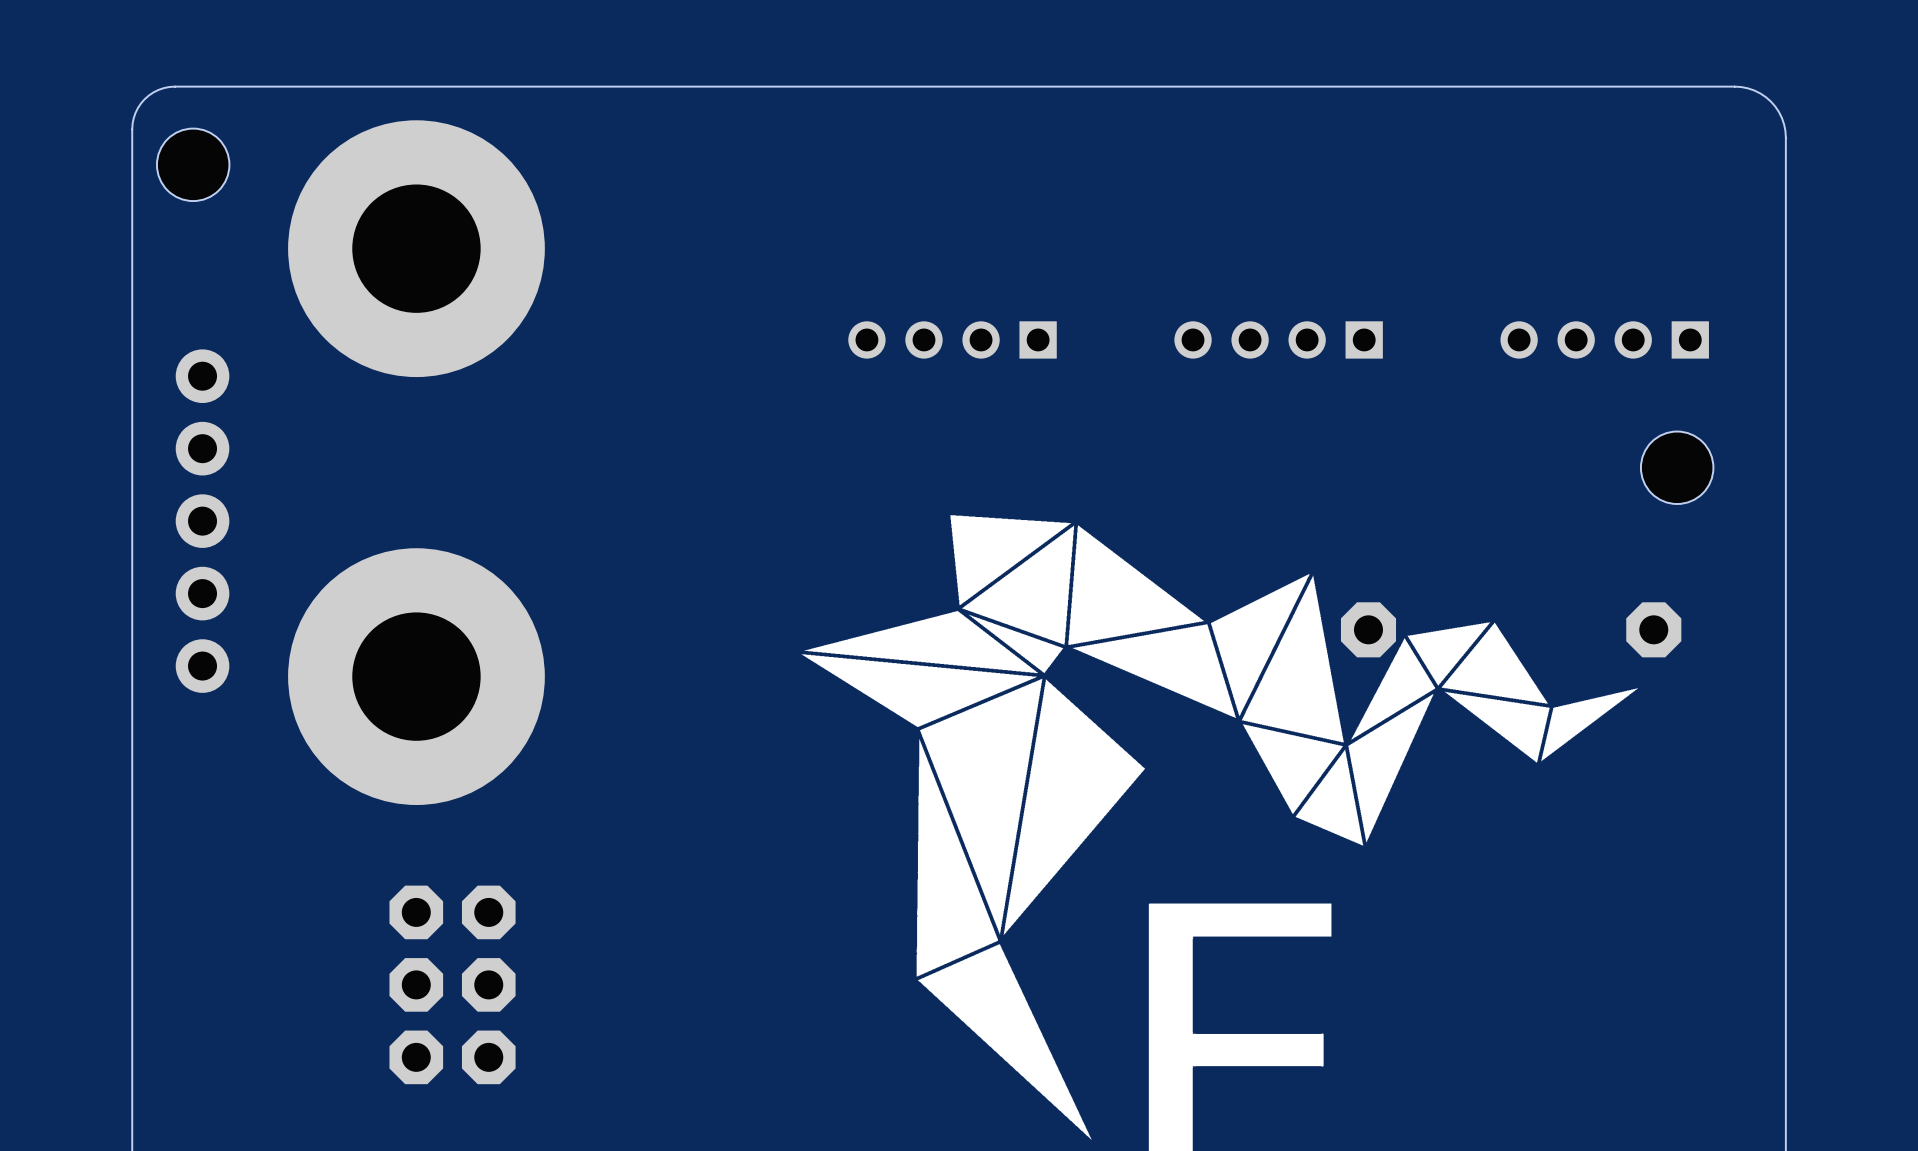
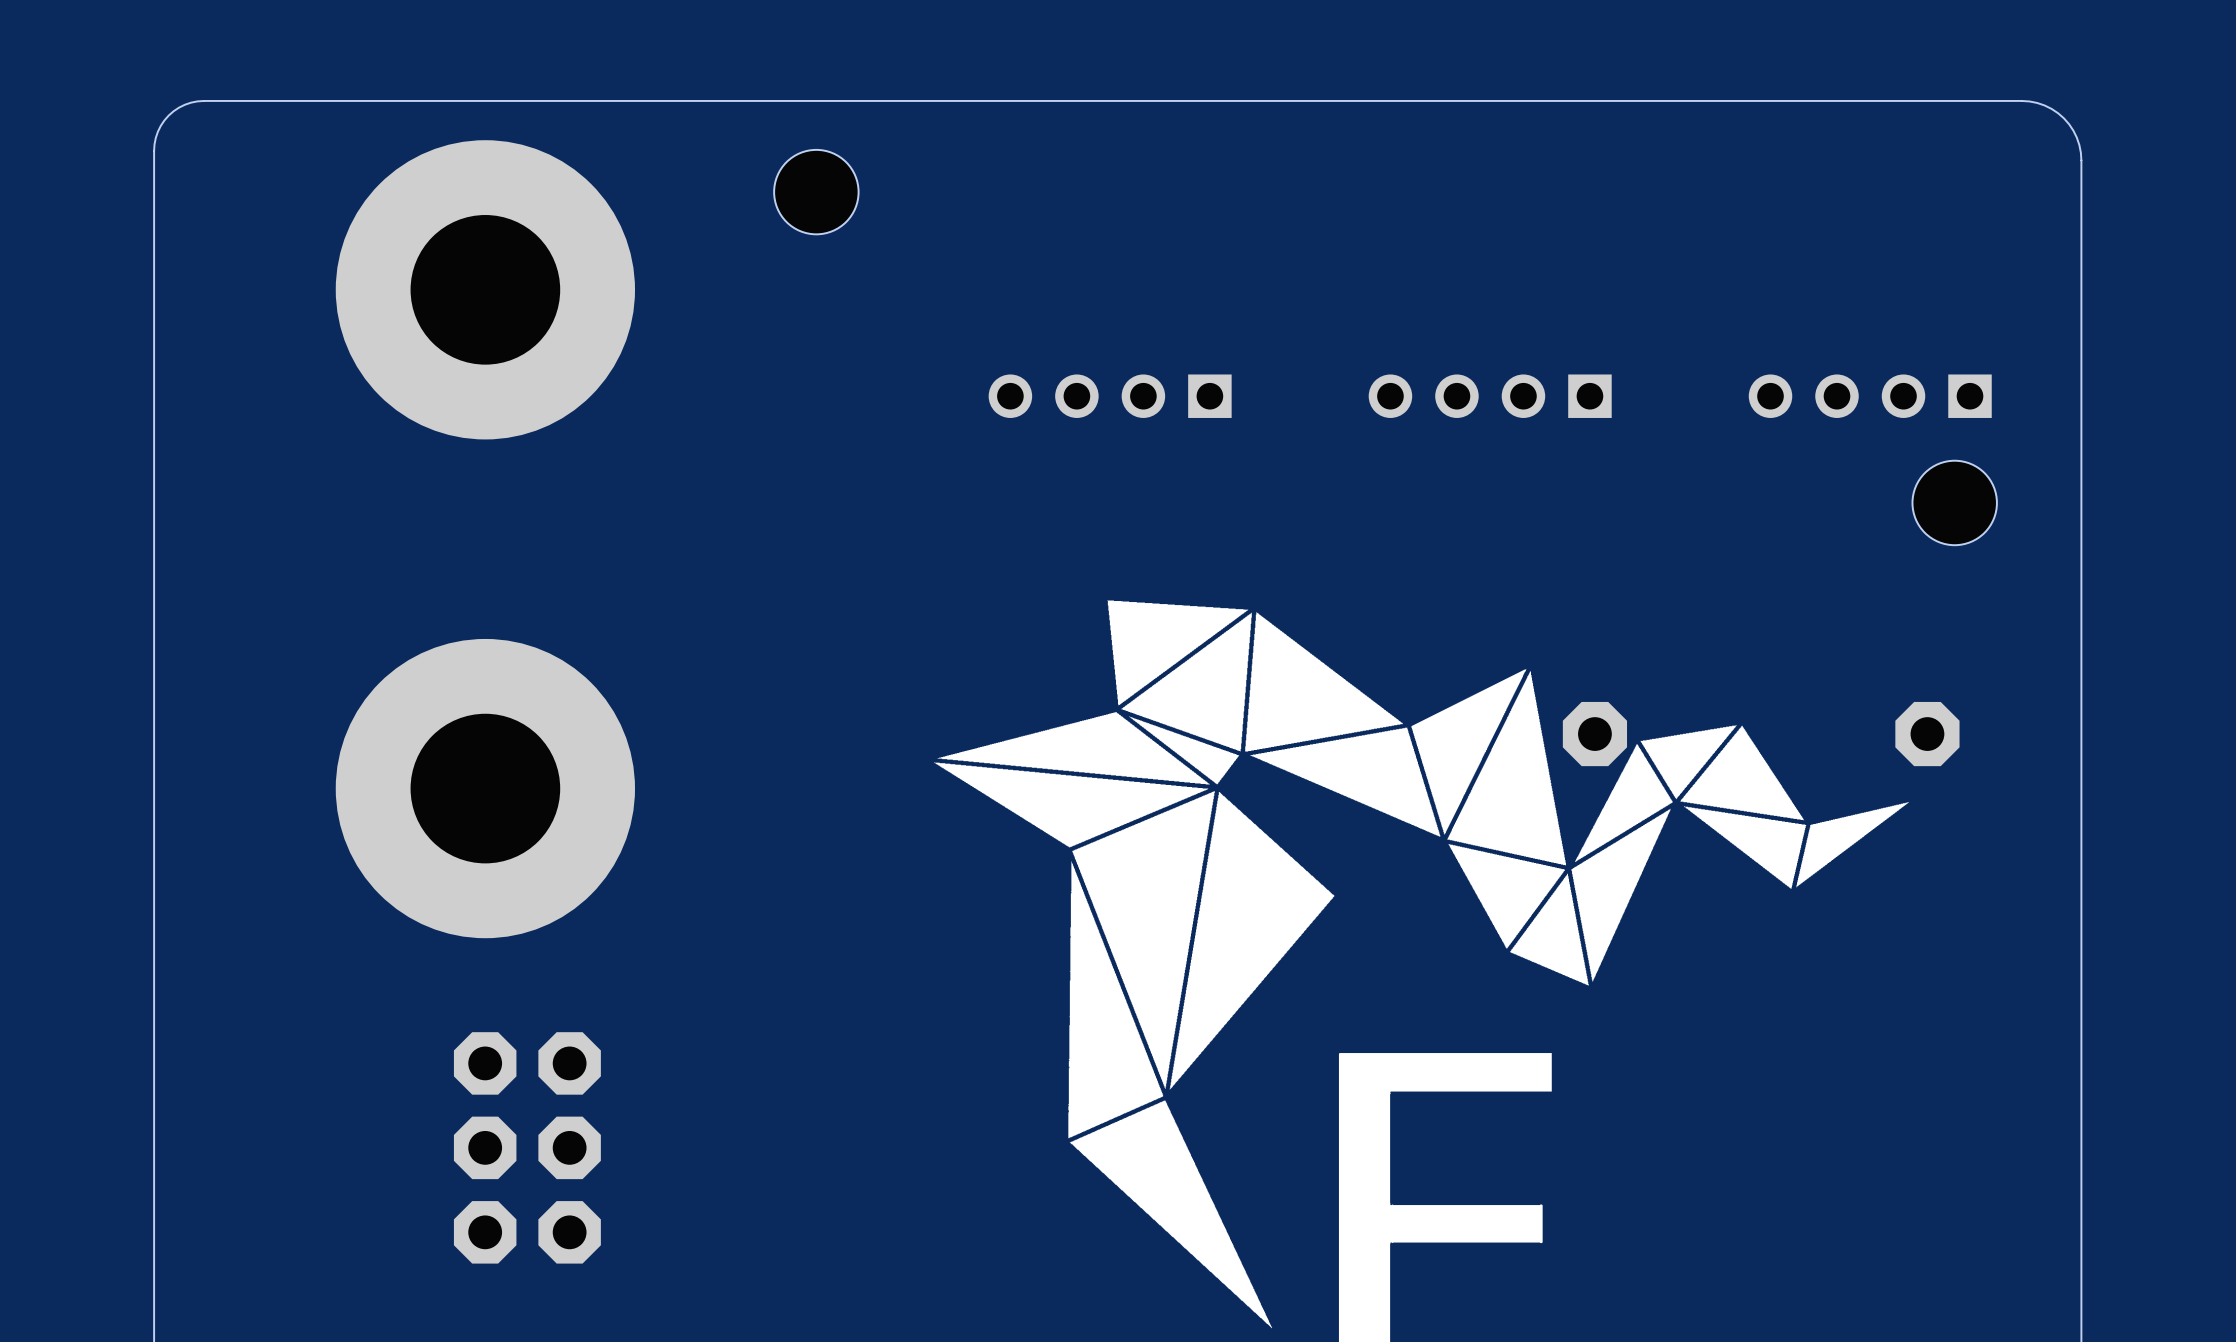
hole position: (193, 164) -> (816, 192)
hole position: (1677, 467) -> (1954, 502)
part: (202, 521) -> none

